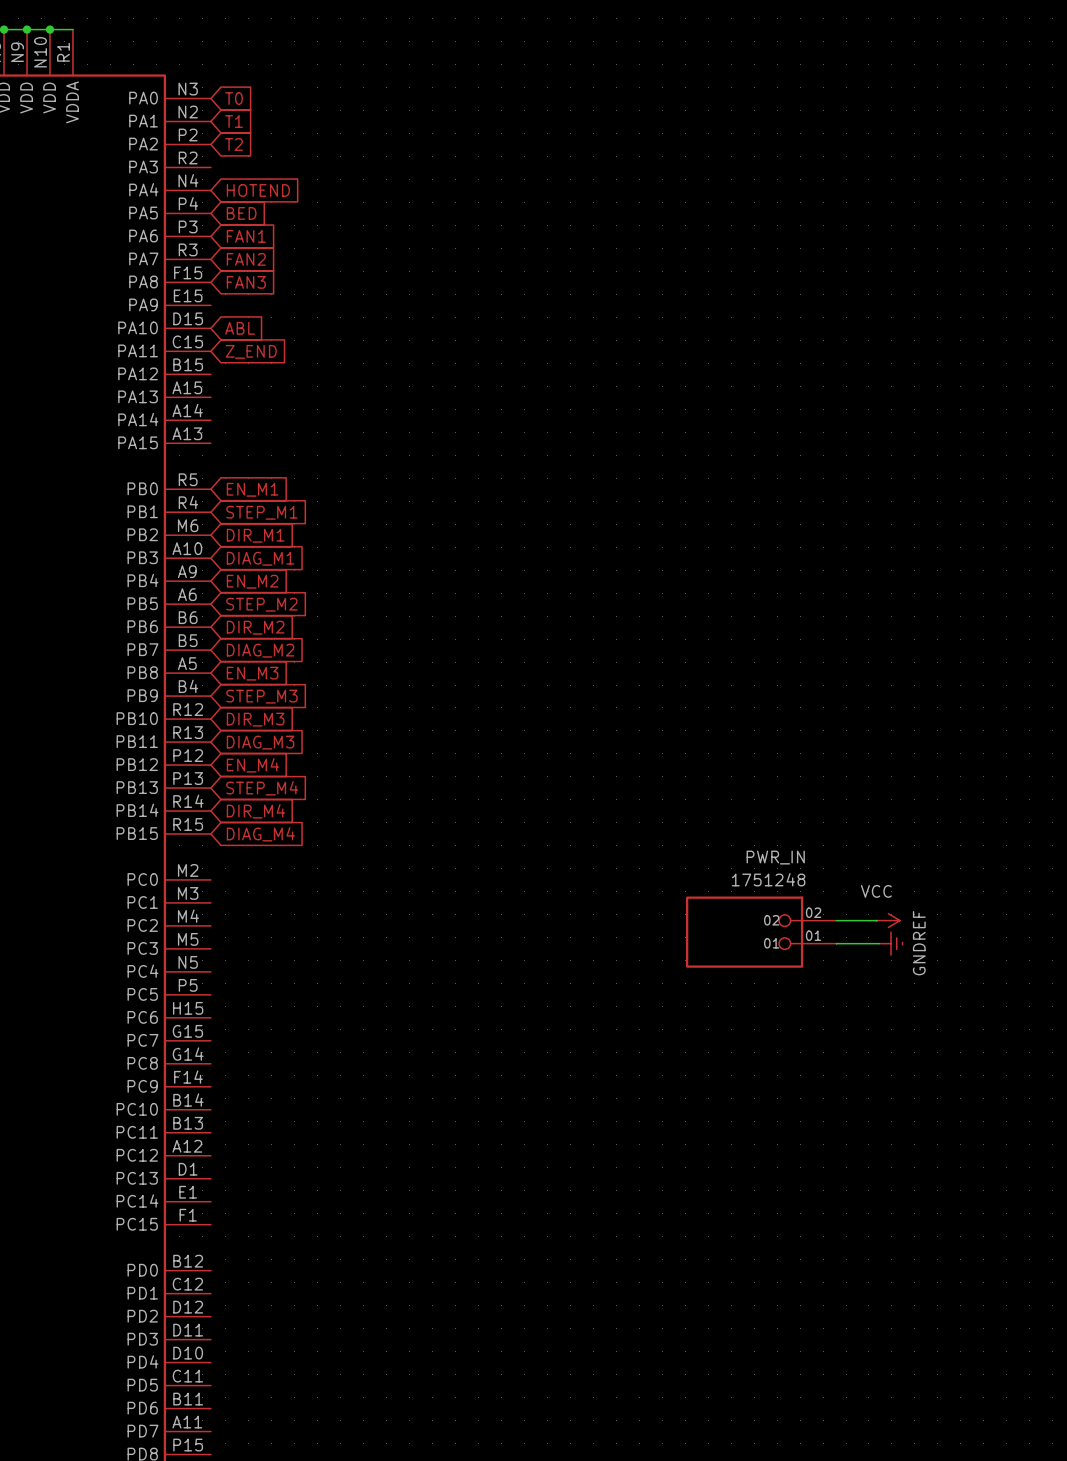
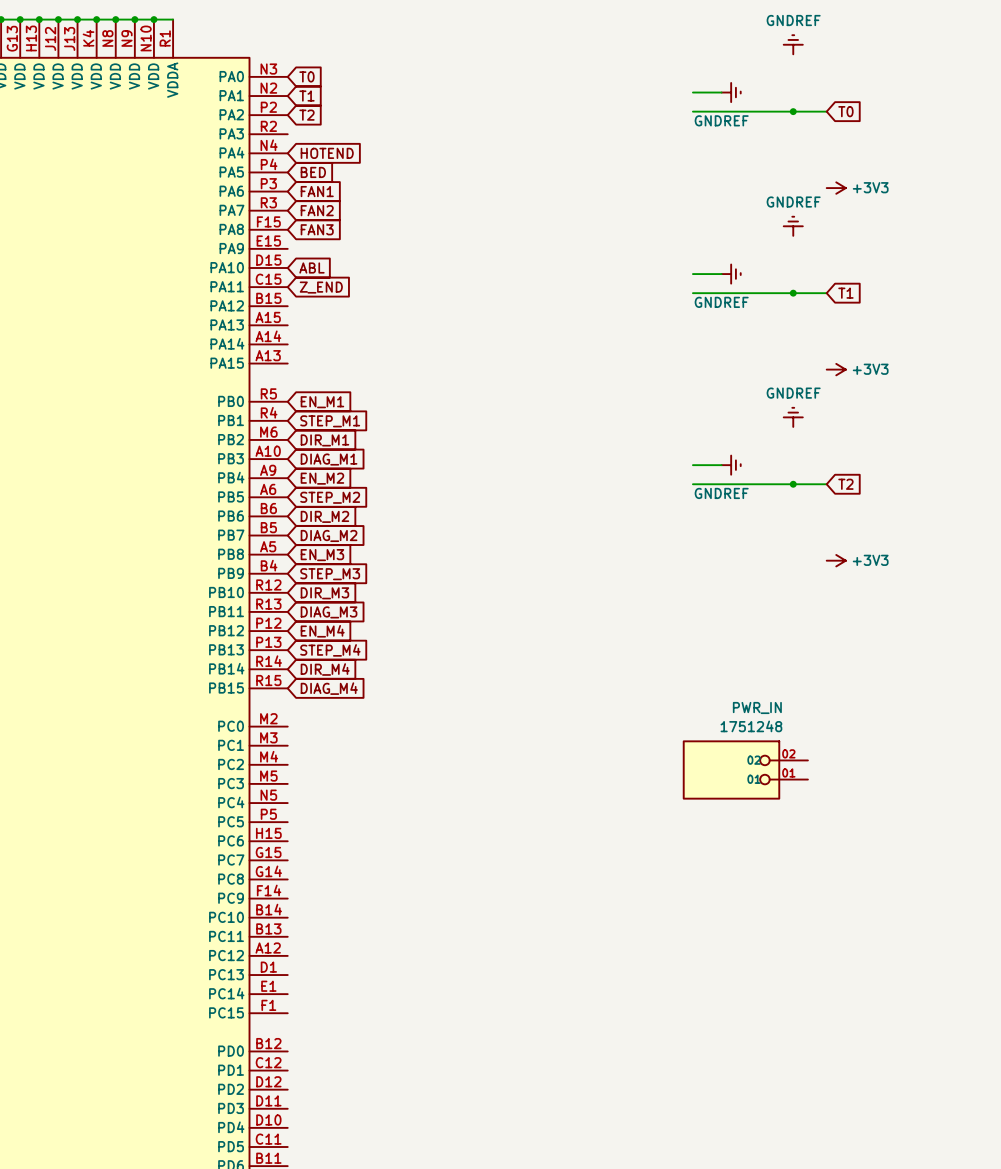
power symbol: none -> GNDREF (793, 44)
wire: none -> (692, 92) (721, 92)
power symbol: none -> GNDREF (731, 92)
wire: none -> (692, 111) (826, 111)
junction: none -> (793, 111)
global label: none -> T0 (845, 111)
power symbol: none -> +3V3 (836, 188)
power symbol: none -> GNDREF (793, 226)
wire: none -> (692, 274) (721, 274)
power symbol: none -> GNDREF (731, 274)
wire: none -> (692, 293) (826, 293)
junction: none -> (793, 293)
global label: none -> T1 (845, 293)
power symbol: none -> +3V3 (836, 369)
power symbol: none -> GNDREF (793, 417)
wire: none -> (692, 465) (721, 465)
power symbol: none -> GNDREF (731, 465)
wire: none -> (692, 484) (826, 484)
junction: none -> (793, 484)
global label: none -> T2 (845, 484)
power symbol: none -> +3V3 (836, 560)
wire: (836, 920) (876, 920) -> none
power symbol: VCC (888, 920) -> none
wire: (836, 943) (879, 943) -> none
power symbol: GNDREF (891, 943) -> none

